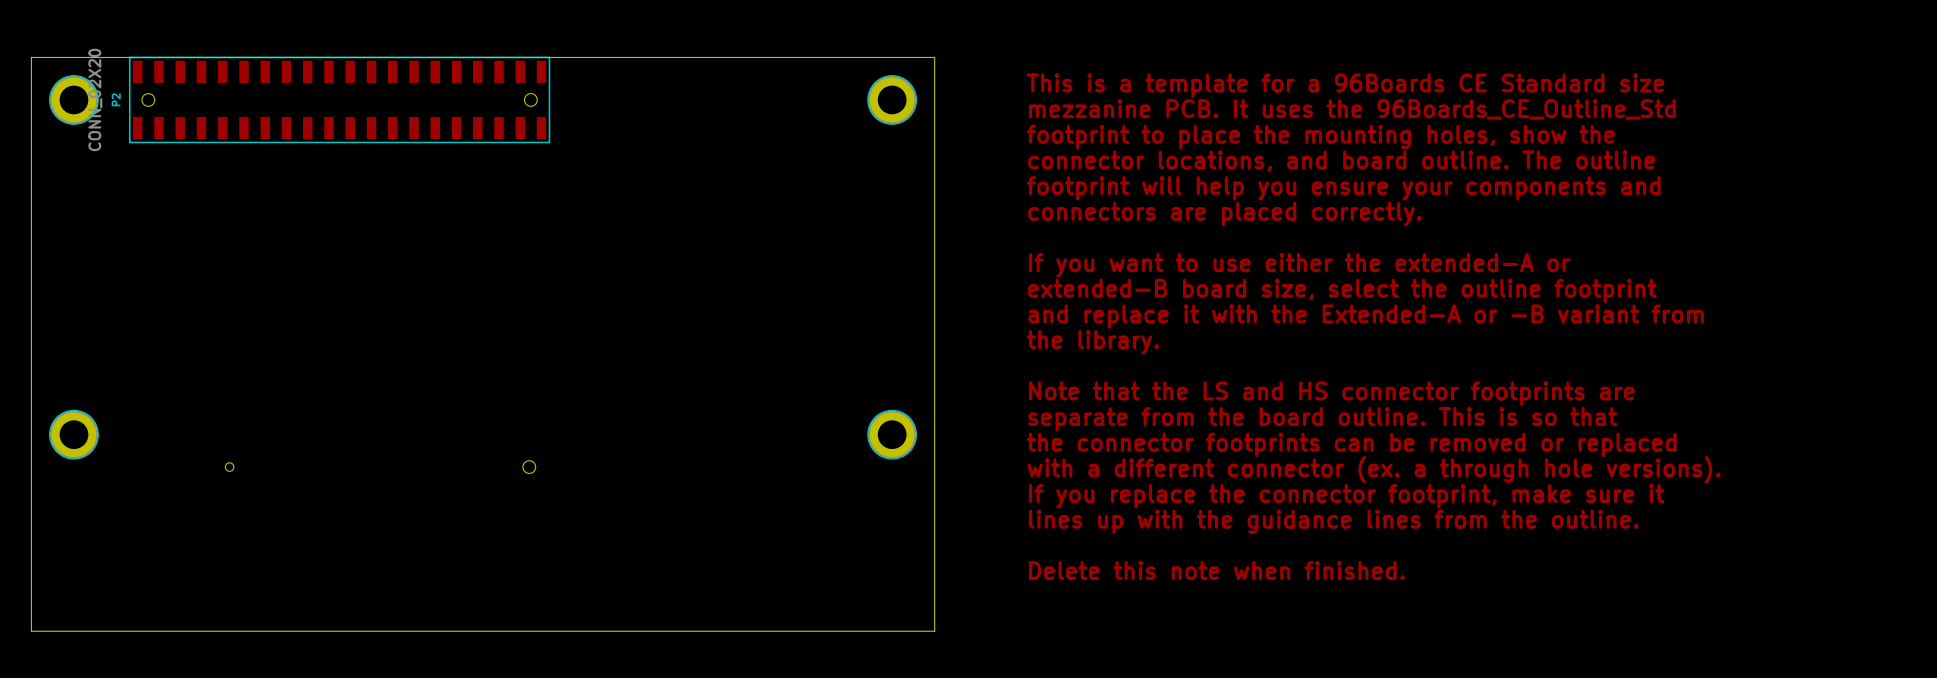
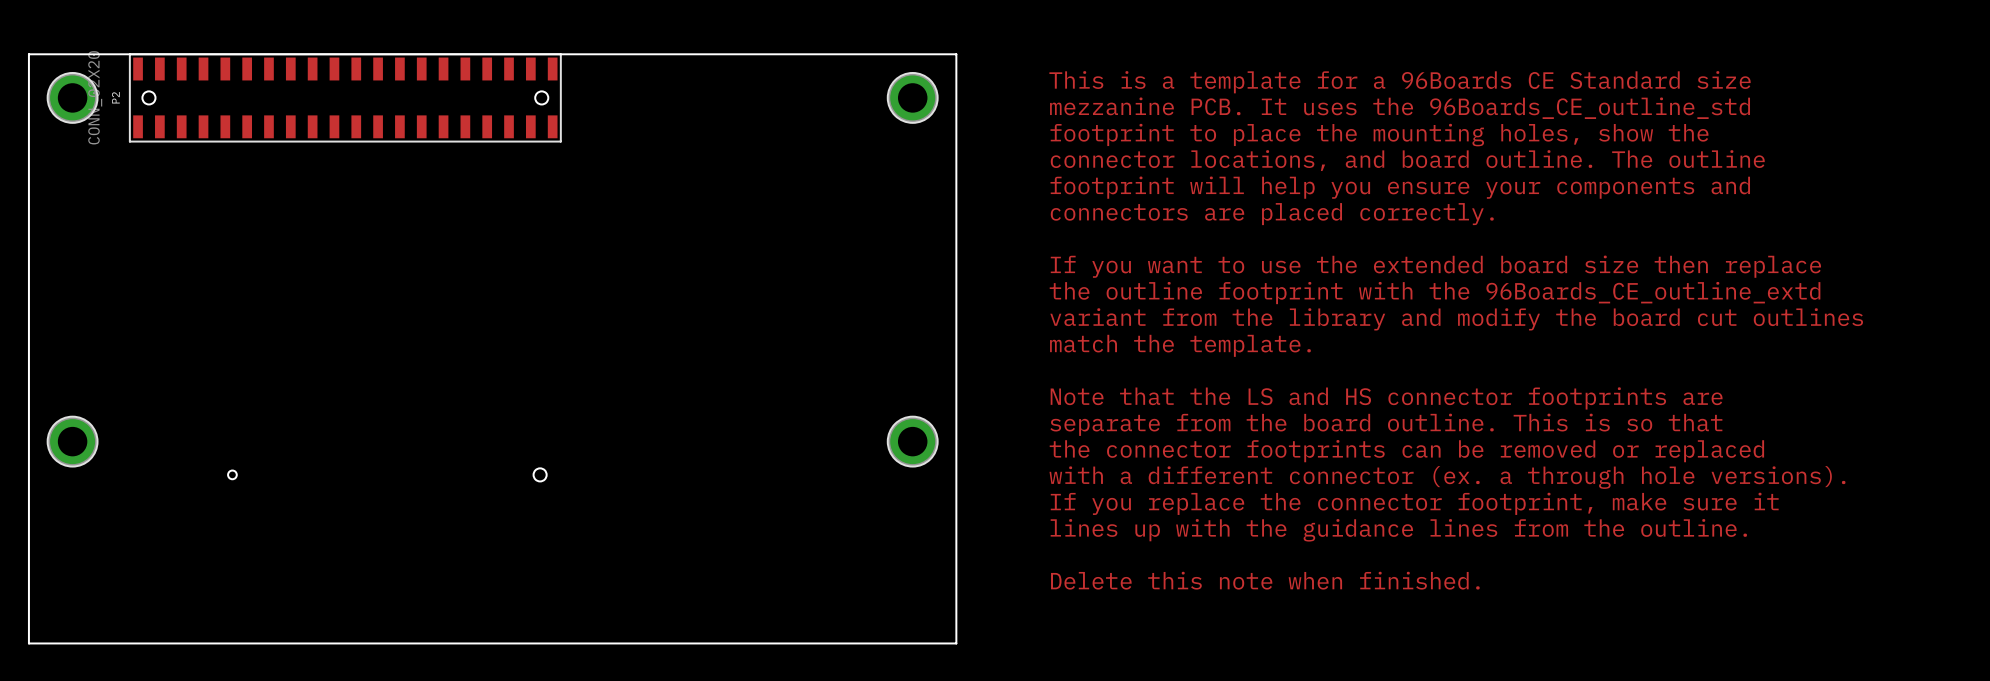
text: mezzanine PCB. It uses the 96Boards_CE_Outline_Std (1352, 109) -> mezzanine PCB. It uses the 96Boards_CE_outline_std (1400, 108)
text: If you want to use either the extended-A or (1299, 265) -> If you want to use the extended board size then replace (1435, 266)
text: extended-B board size, select the outline footprint (1342, 290) -> the outline footprint with the 96Boards_CE_outline_extd (1435, 293)
text: and replace it with the Extended-A or -B variant from (1366, 316) -> variant from the library and modify the board cut outlines (1456, 319)
text: the library. (1092, 342) -> match the template. (1180, 345)

